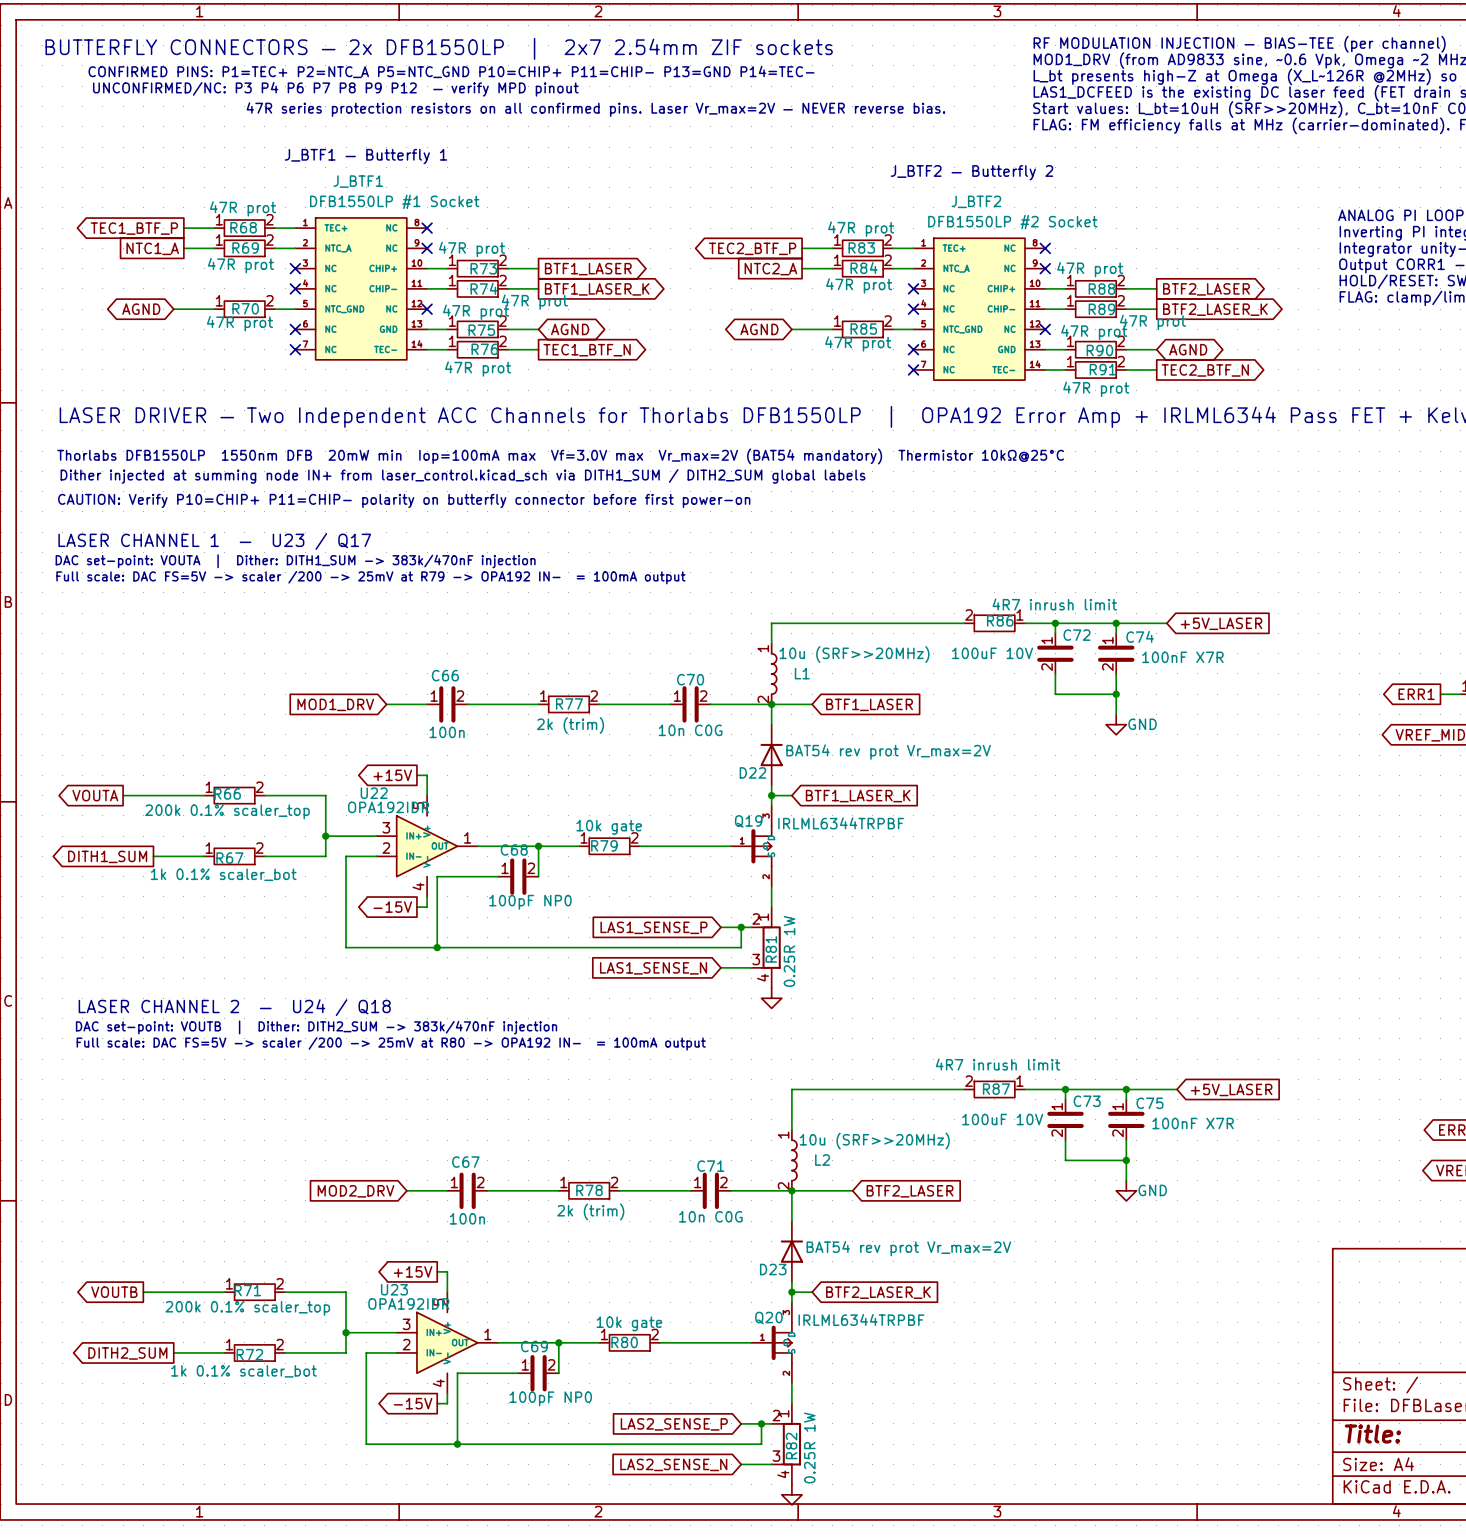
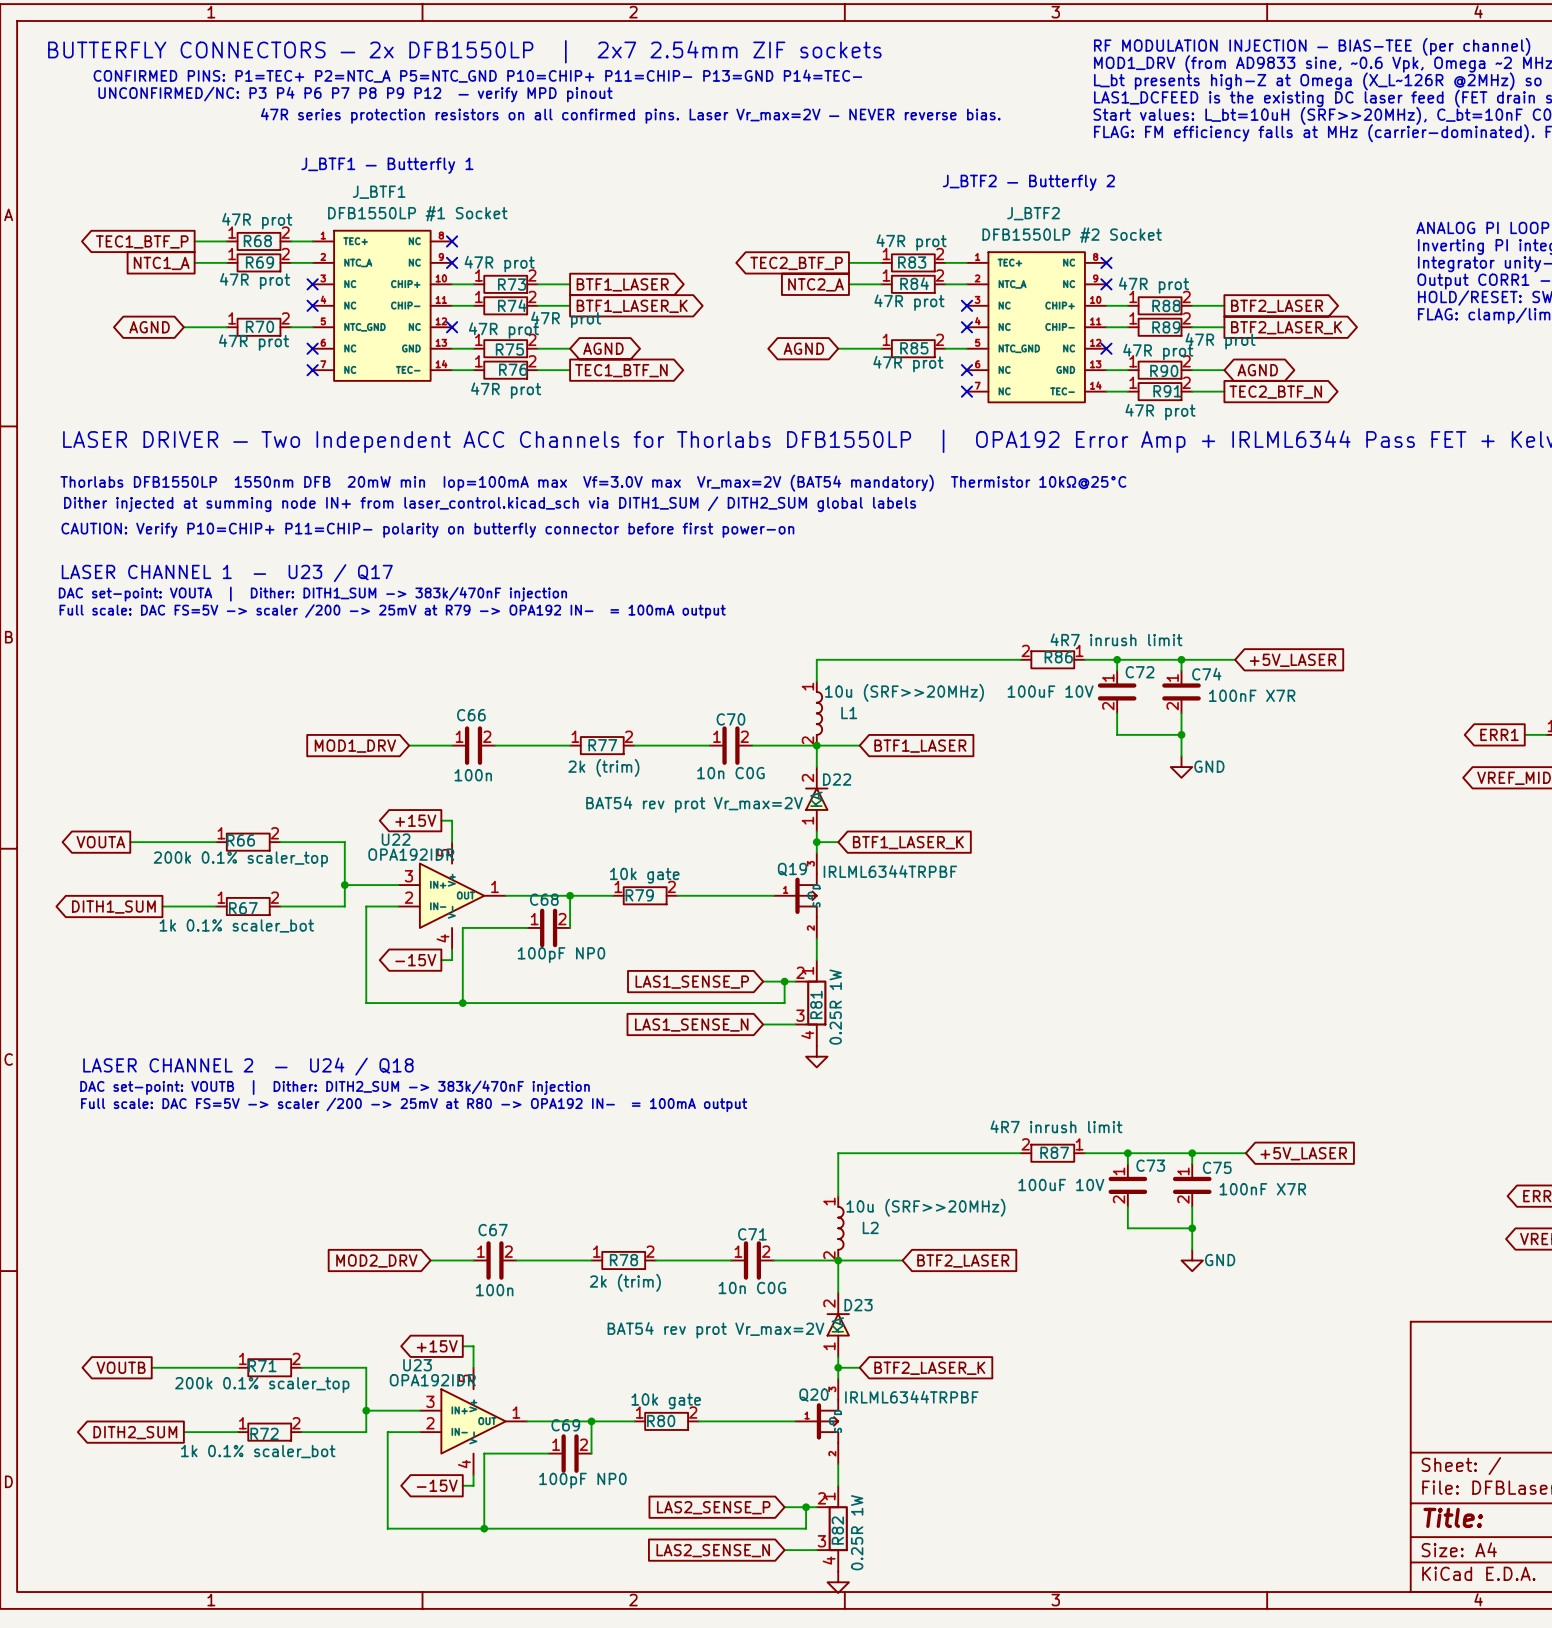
D22 symbol: [760, 724, 783, 786] -> [806, 767, 828, 832]
D22 value position: BAT54 rev prot Vr_max=2V (888, 752) -> BAT54 rev prot Vr_max=2V (694, 804)
D22 name position: D22 (752, 772) -> D22 (837, 779)
D23 symbol: [780, 1221, 804, 1283] -> [827, 1292, 849, 1358]
D23 value position: BAT54 rev prot Vr_max=2V (908, 1248) -> BAT54 rev prot Vr_max=2V (715, 1330)
D23 name position: D23 (773, 1269) -> D23 (858, 1305)

